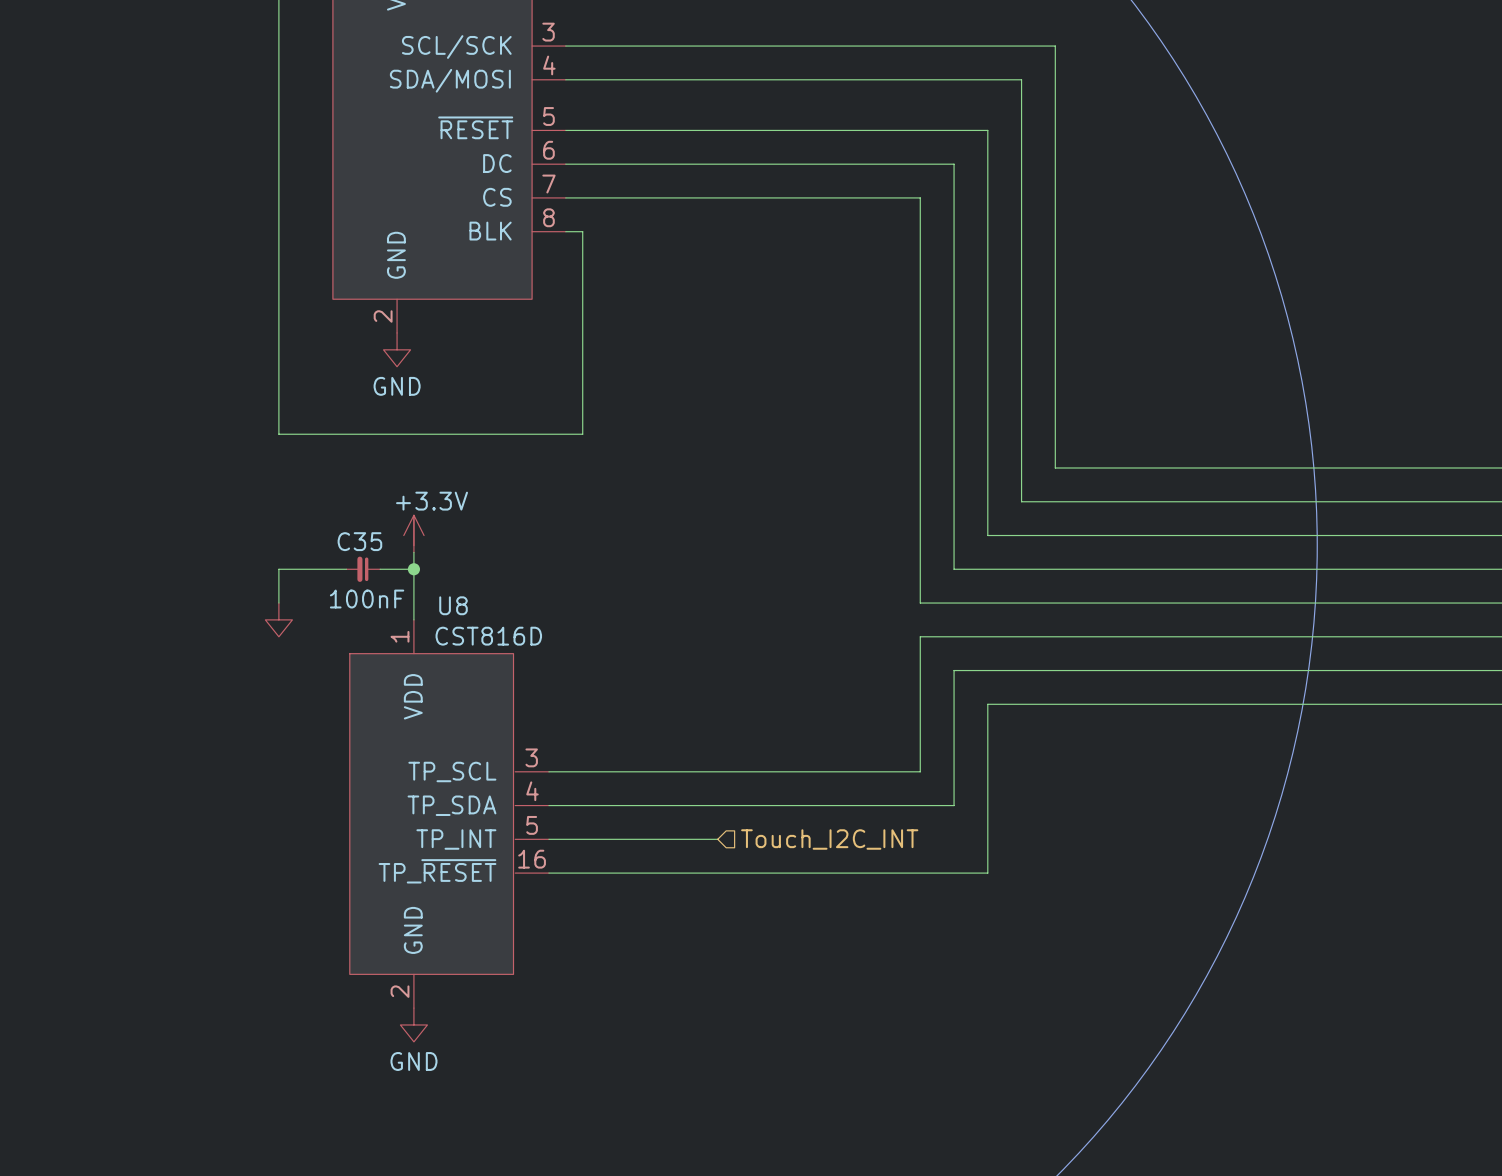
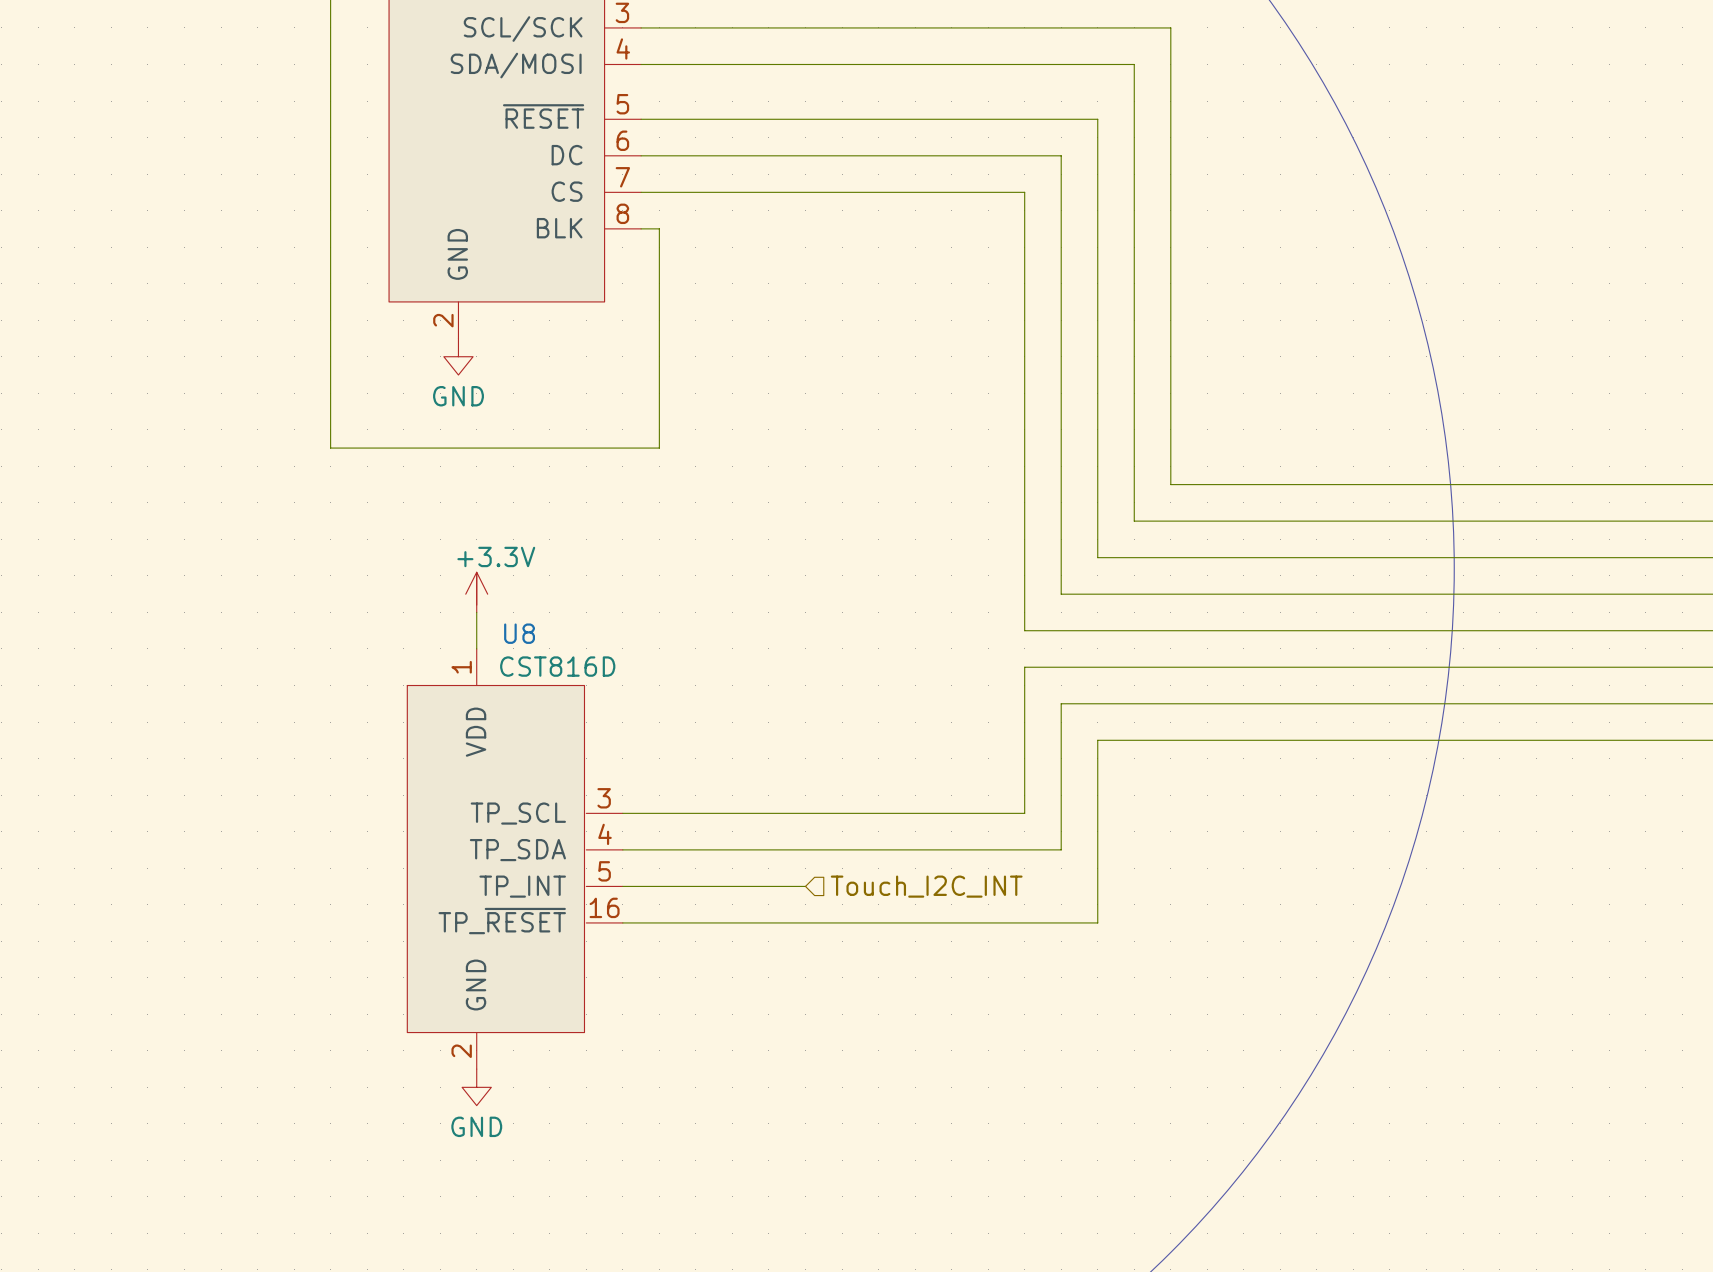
power symbol position: +3.3V (413, 533) -> +3.3V (476, 592)
wire: (346, 569) (278, 569) (278, 603) -> none
C35: 100nF (363, 569) -> none
wire: (380, 569) (413, 569) -> none
junction: (413, 569) -> none
power symbol: (278, 619) -> none

